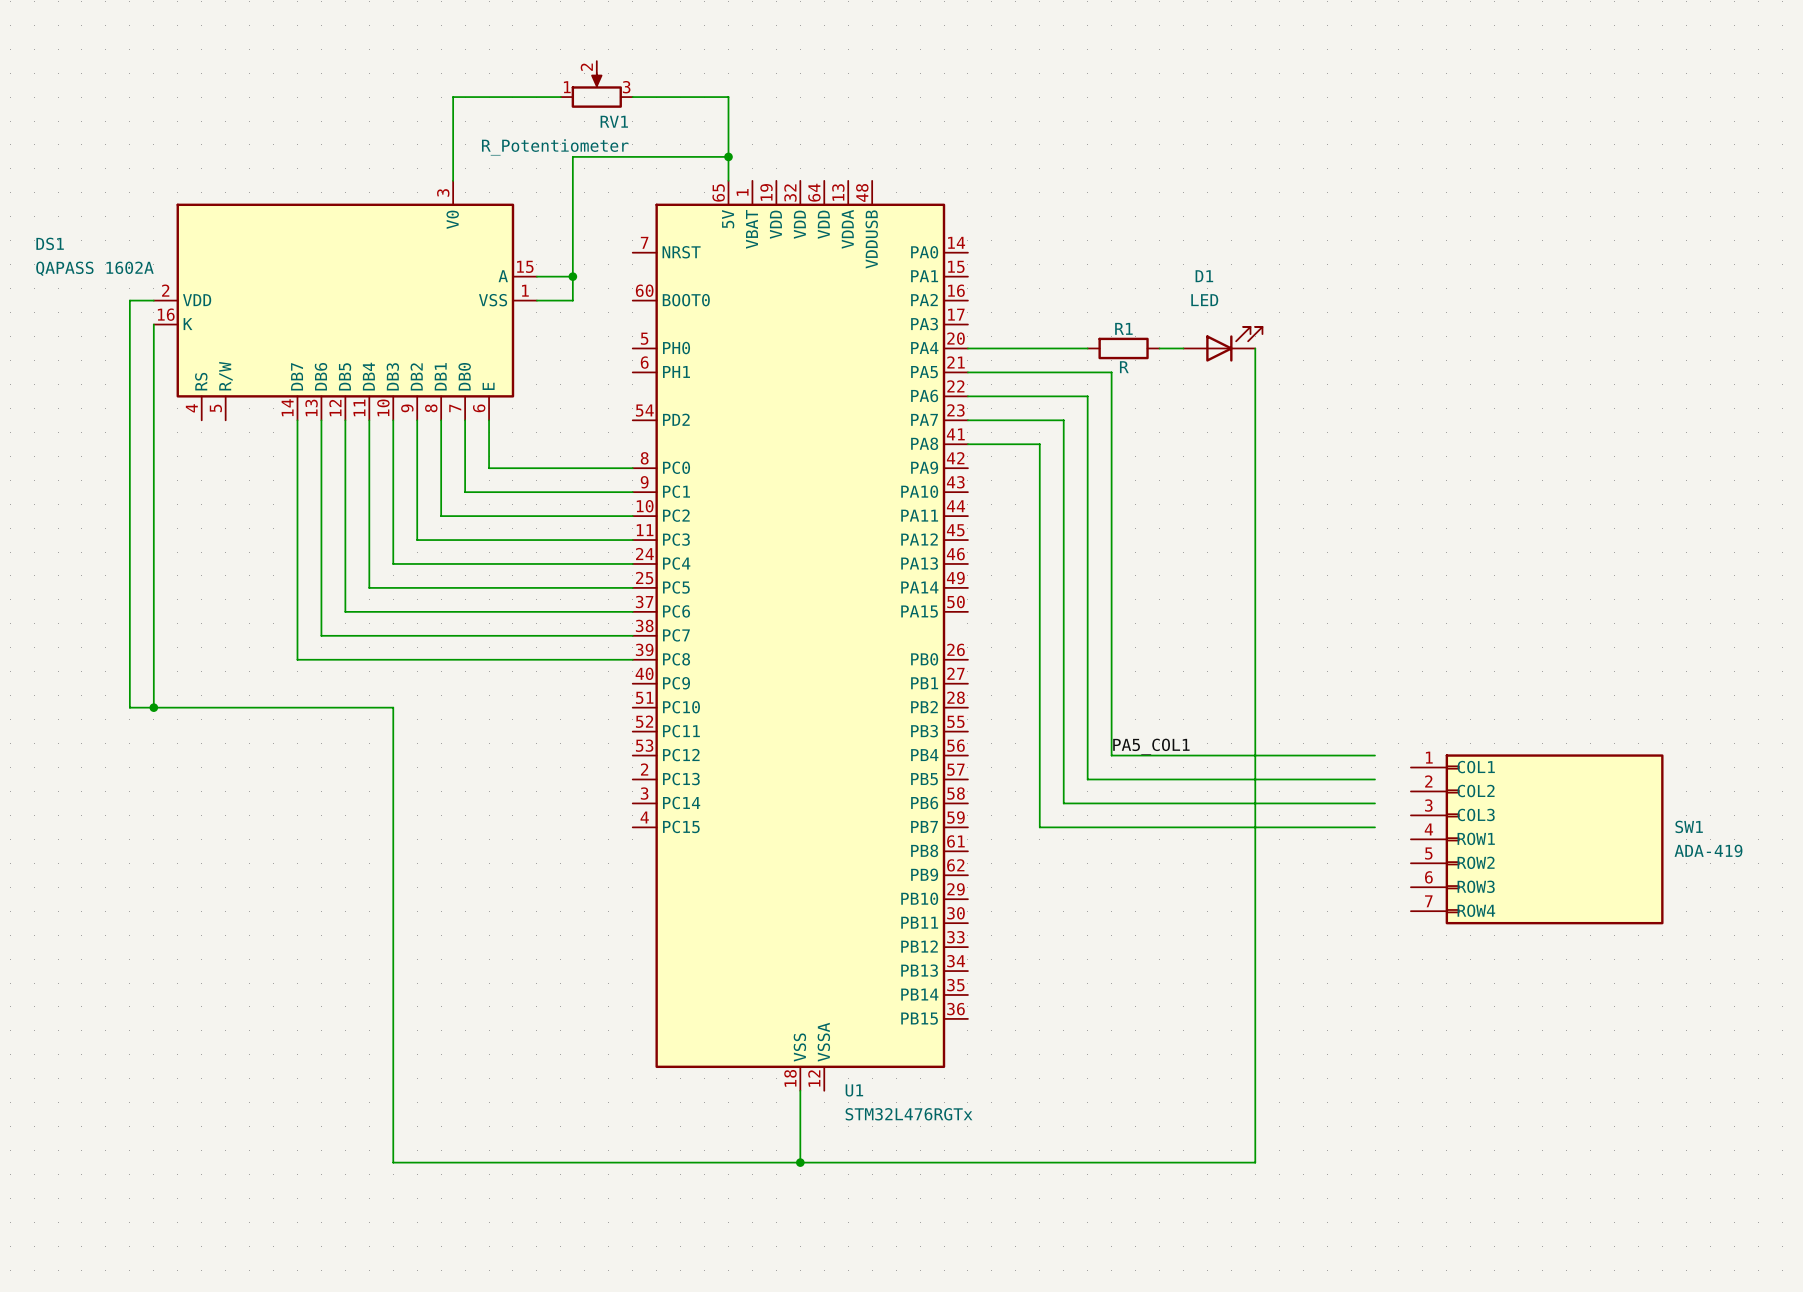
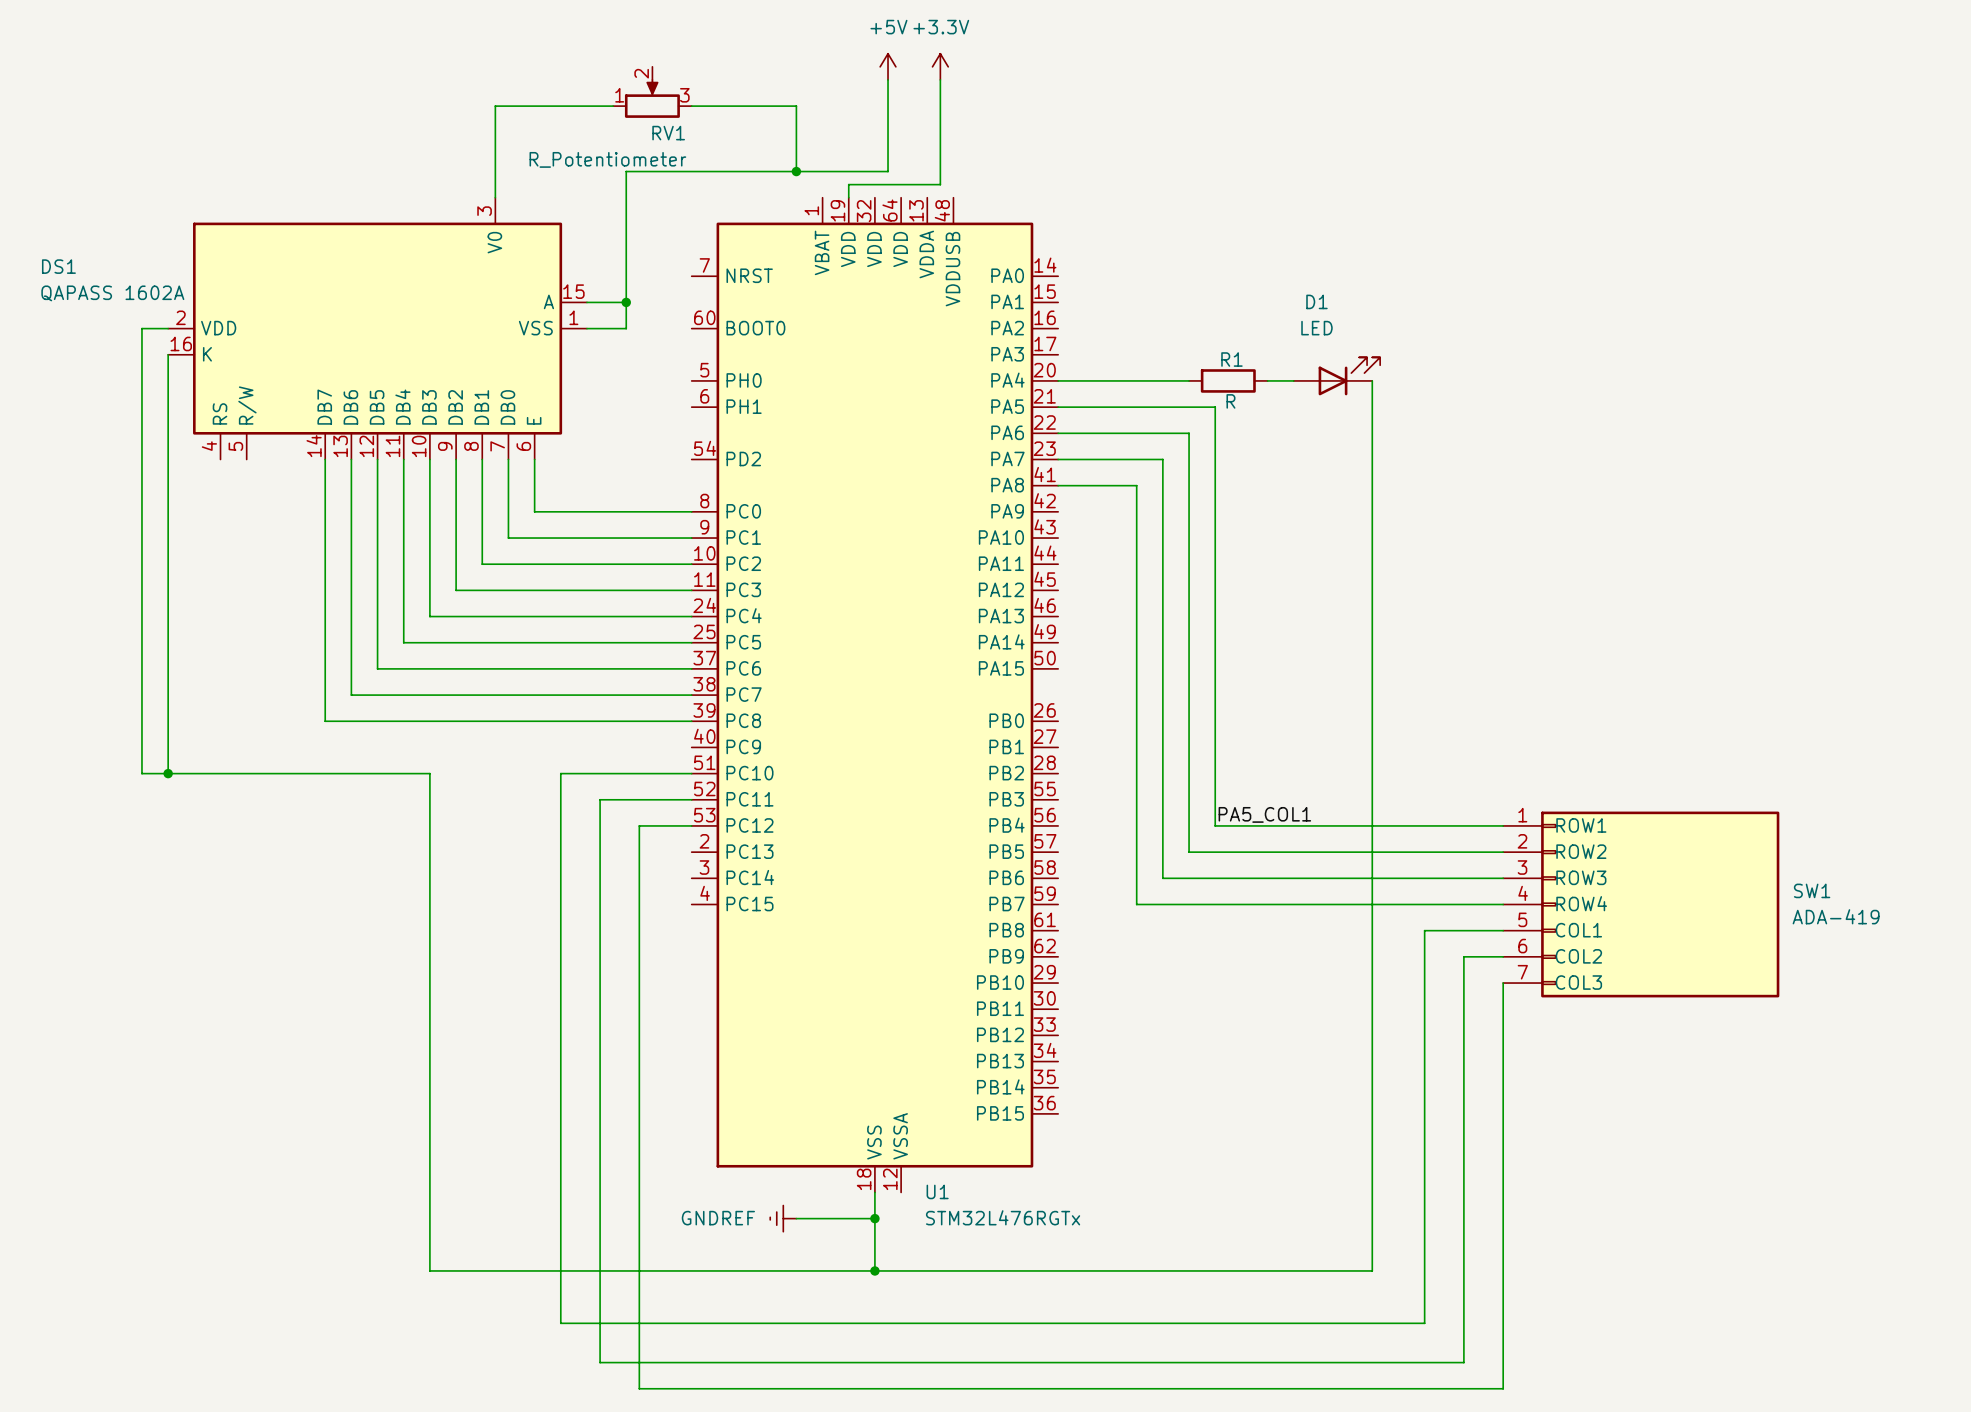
power symbol: none -> +5V (888, 66)
power symbol: none -> +3.3V (940, 66)
wire: none -> (940, 79) (940, 184) (848, 184) (848, 197)
wire: (728, 156) (728, 180) -> (796, 171) (888, 171) (888, 79)
U1 symbol: [632, 180, 968, 1091] -> [691, 197, 1059, 1193]
wire: none -> (691, 773) (560, 773) (560, 1323) (1424, 1323) (1424, 930) (1503, 930)
wire: none -> (691, 799) (600, 799) (600, 1362) (1463, 1362) (1463, 956) (1503, 956)
wire: none -> (691, 825) (639, 825) (639, 1388) (1503, 1388) (1503, 983)
SW1 pin name: COL1 (1476, 767) -> ROW1 (1581, 825)
SW1 pin name: COL2 (1476, 791) -> ROW2 (1581, 851)
SW1 pin name: COL3 (1476, 814) -> ROW3 (1581, 877)
SW1 pin name: ROW1 (1476, 838) -> ROW4 (1581, 903)
SW1 position: (1537, 839) -> (1641, 904)
SW1 pin name: ROW2 (1476, 862) -> COL1 (1578, 930)
SW1 pin name: ROW3 (1476, 886) -> COL2 (1578, 956)
SW1 pin name: ROW4 (1476, 910) -> COL3 (1578, 982)
power symbol: none -> GNDREF (783, 1218)
wire: none -> (796, 1218) (874, 1218)
junction: none -> (874, 1218)

